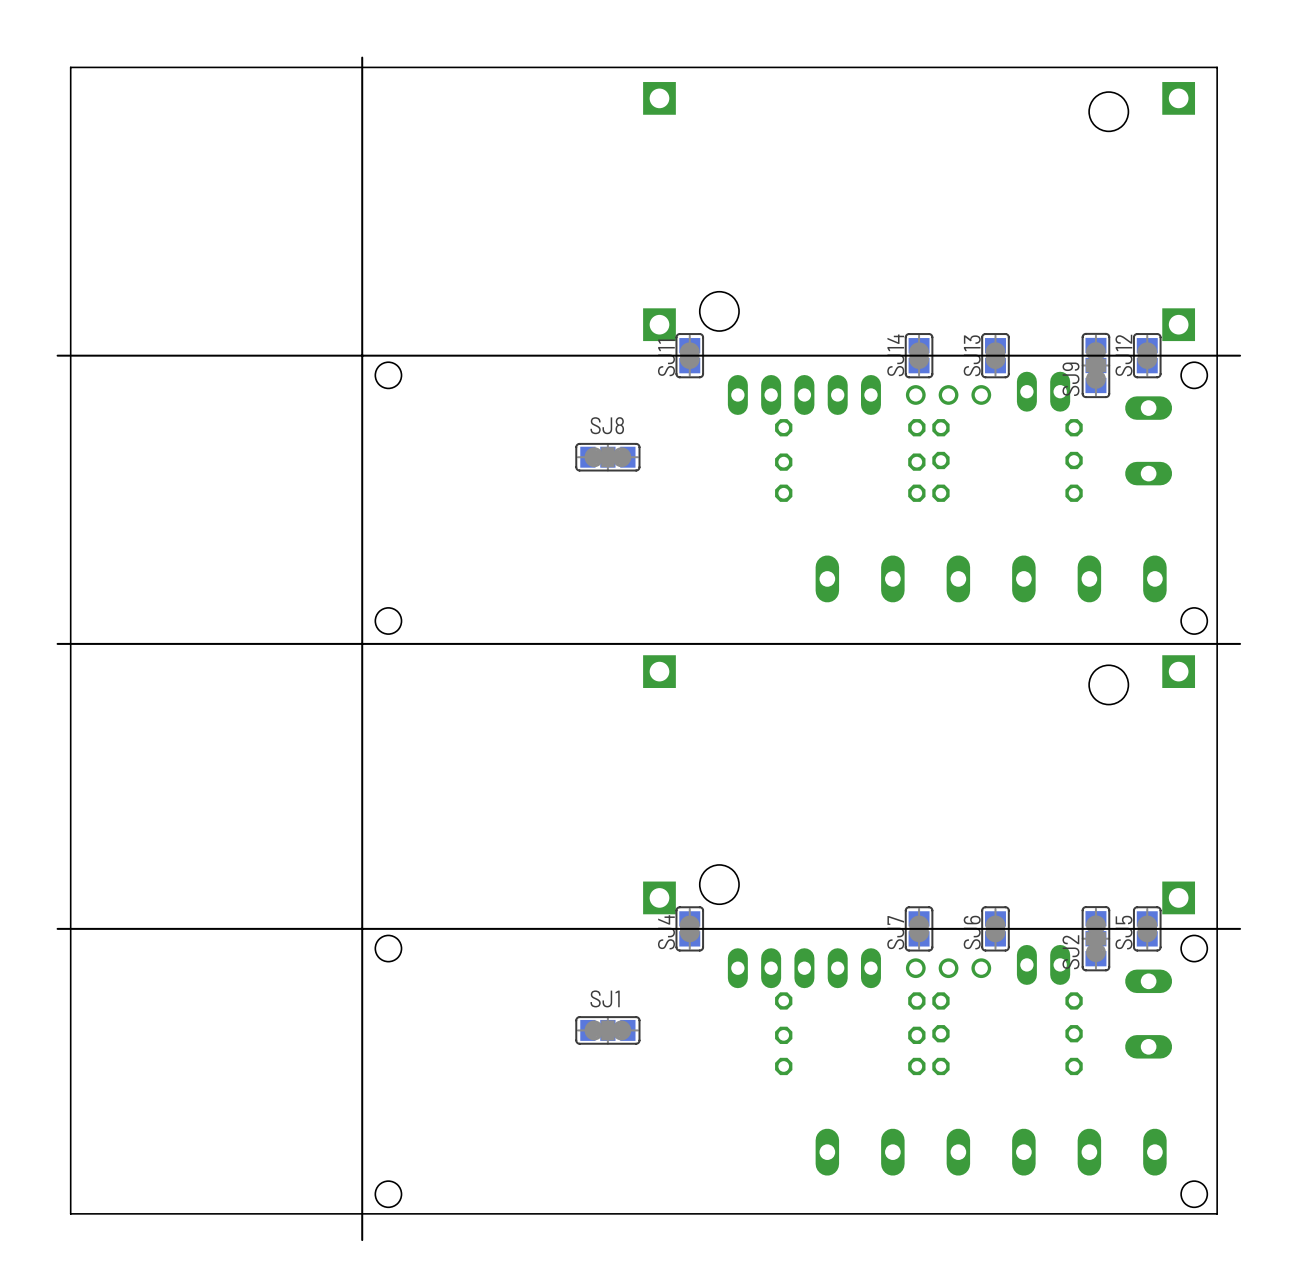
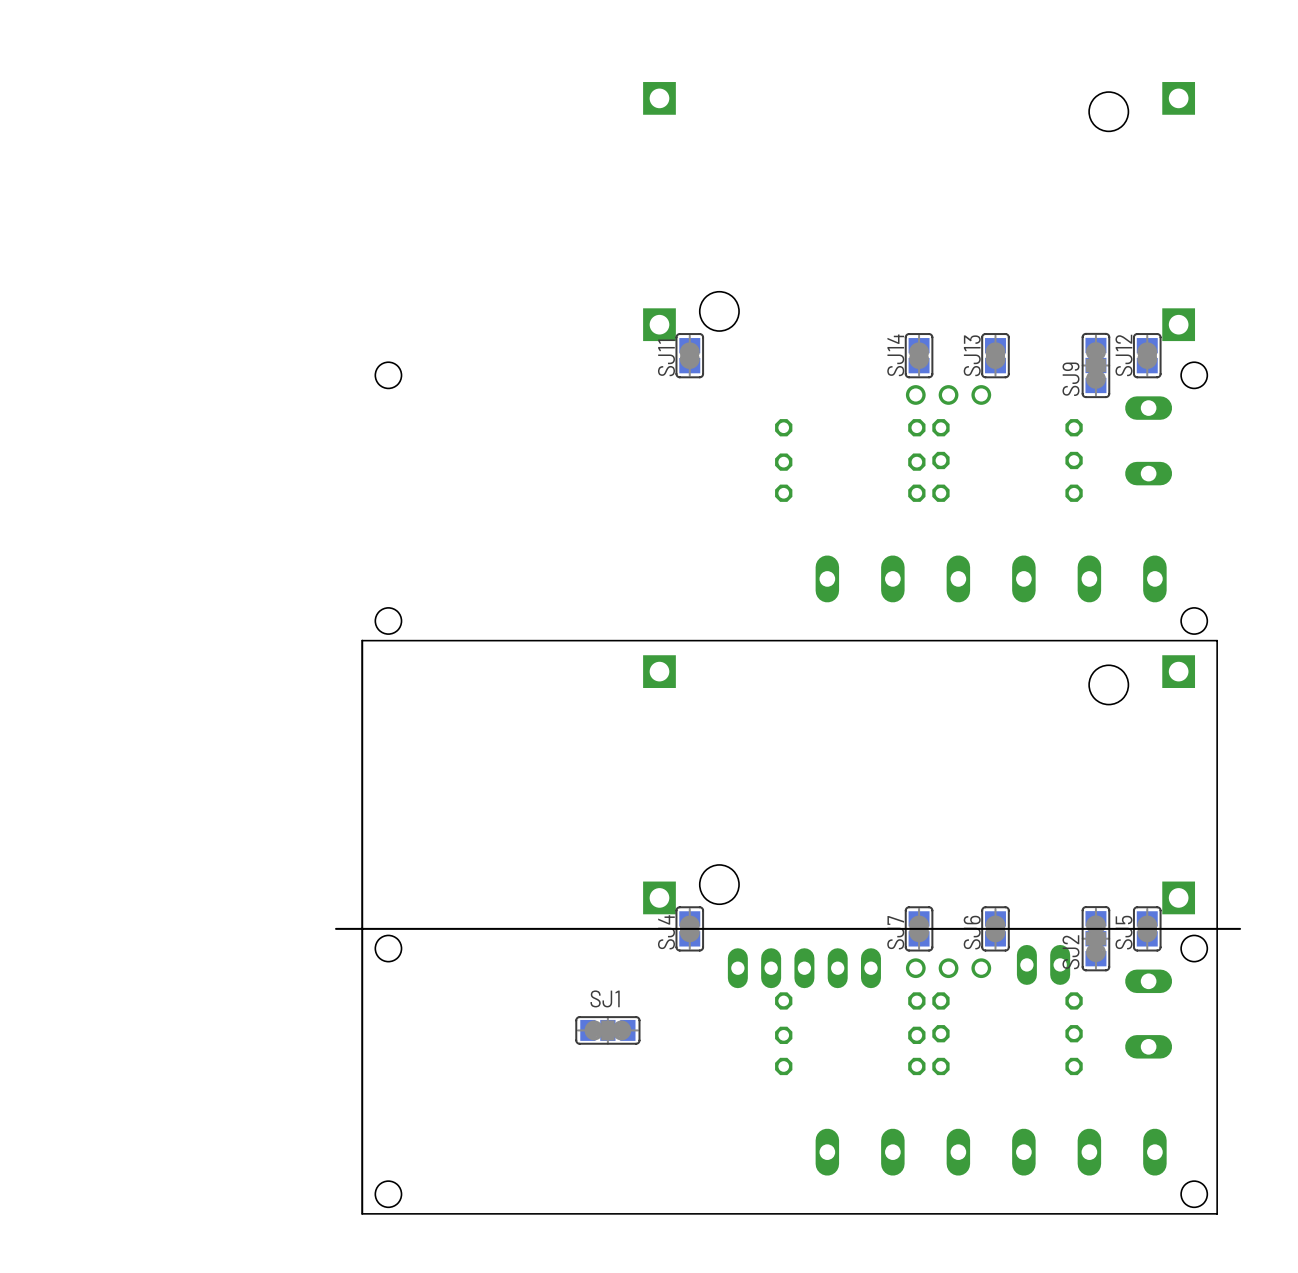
board edge: (362, 57) (362, 640) -> none
board edge: (1240, 355) (57, 355) -> none
part: (1043, 391) -> none
part: (804, 394) -> none
SJ8: (607, 457) -> none
board edge: (1217, 640) (1217, 67) (70, 67) (70, 1213) (362, 1213) (362, 1240) -> (1217, 640) (362, 640)
board edge: (1240, 643) (57, 643) -> none
board edge: (336, 928) (57, 928) -> none

